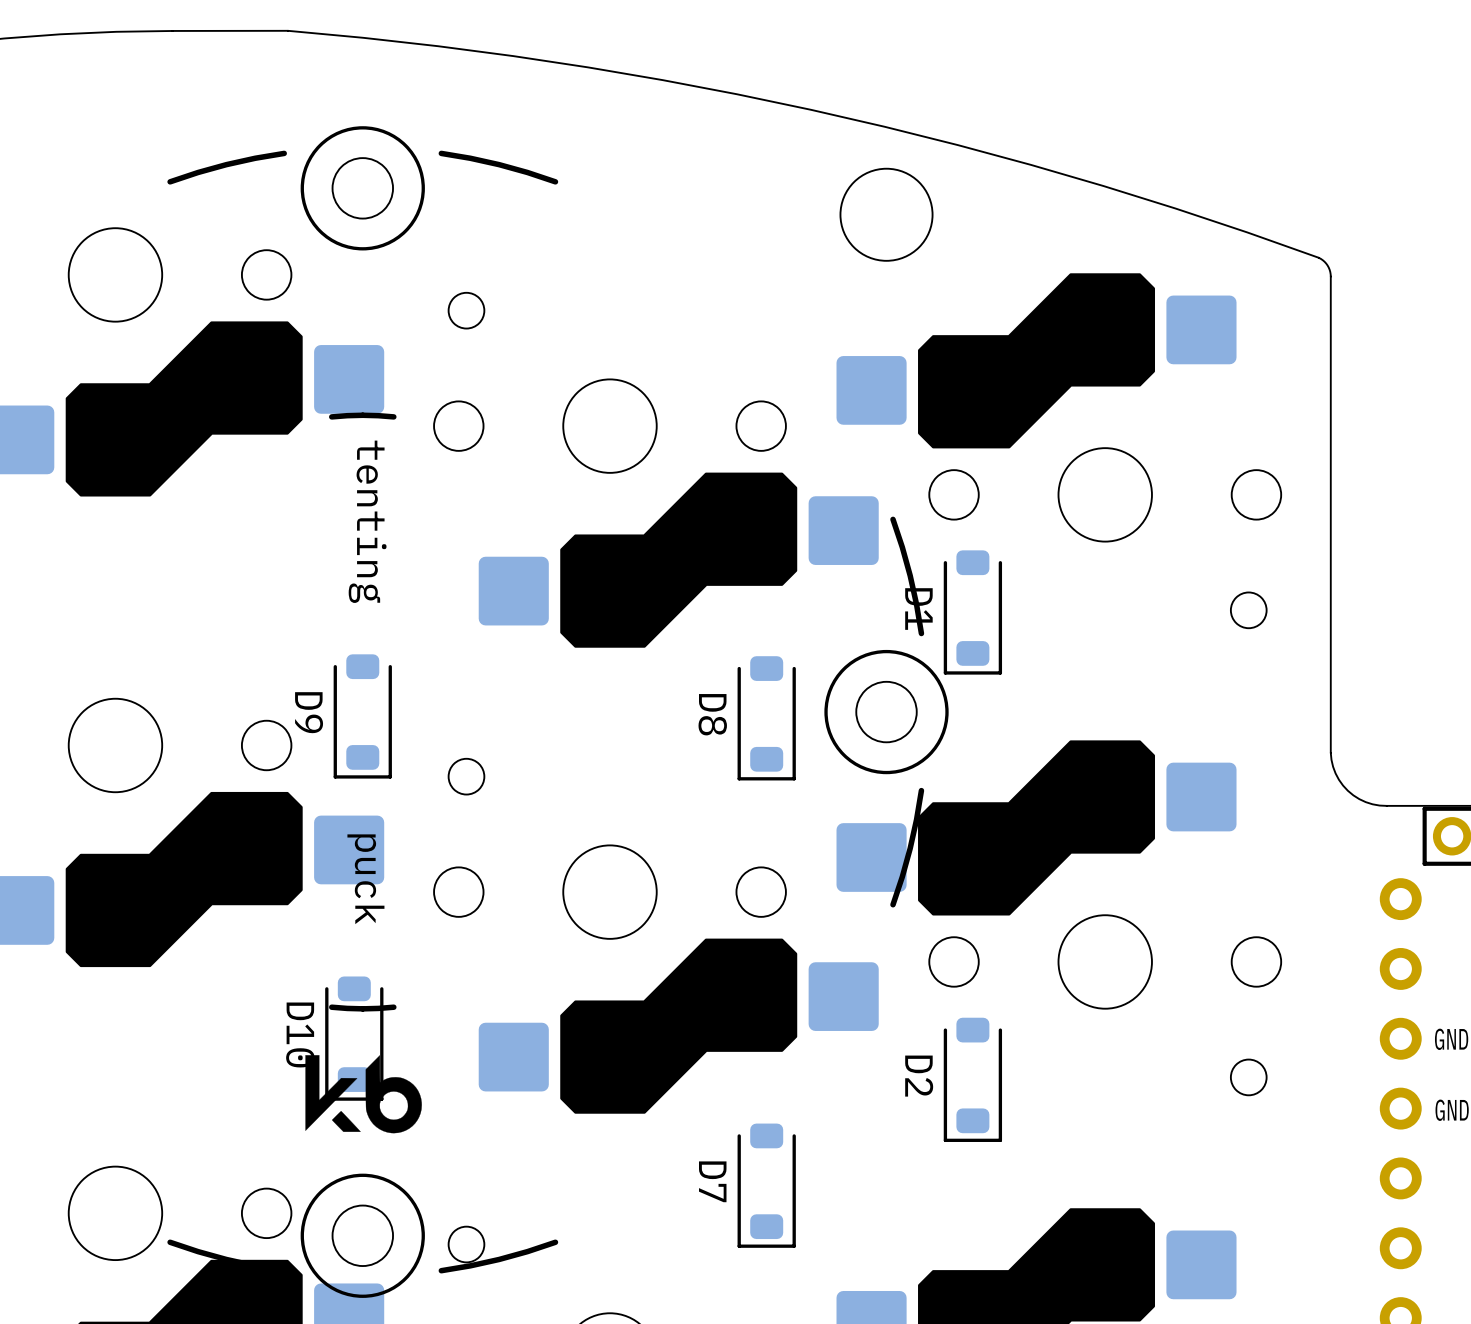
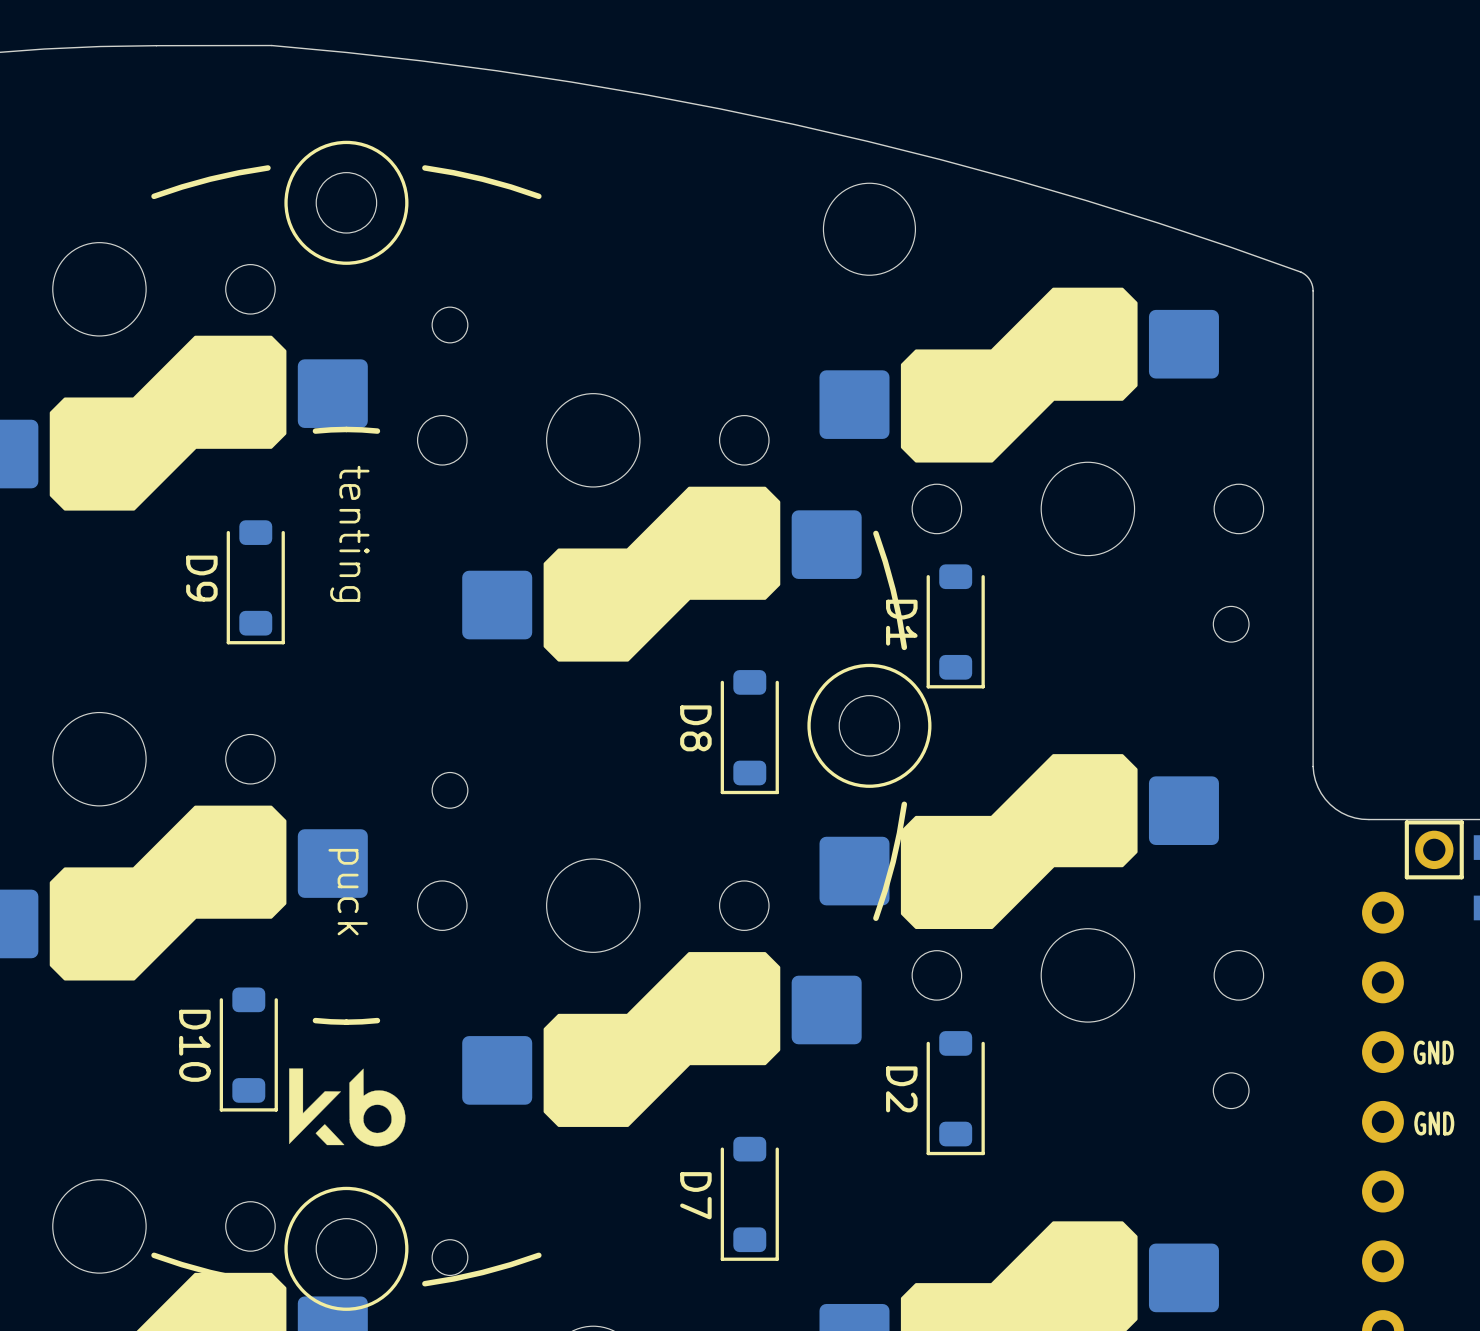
D9 position: (362, 716) -> (255, 582)
D10 position: (354, 1038) -> (248, 1049)

